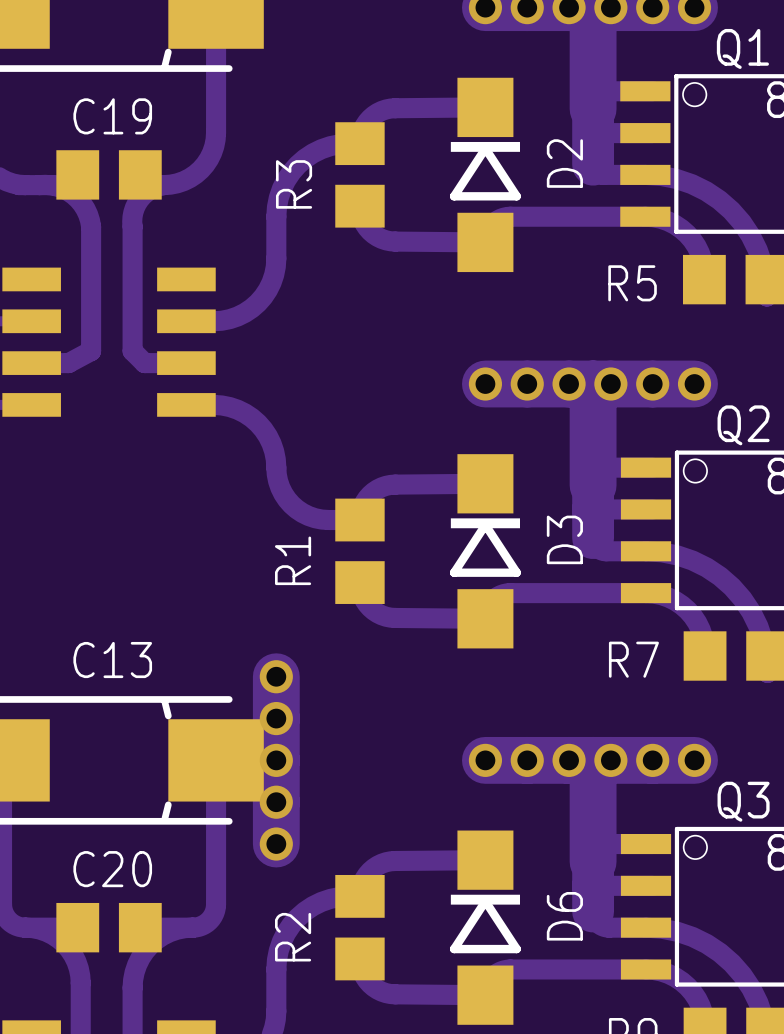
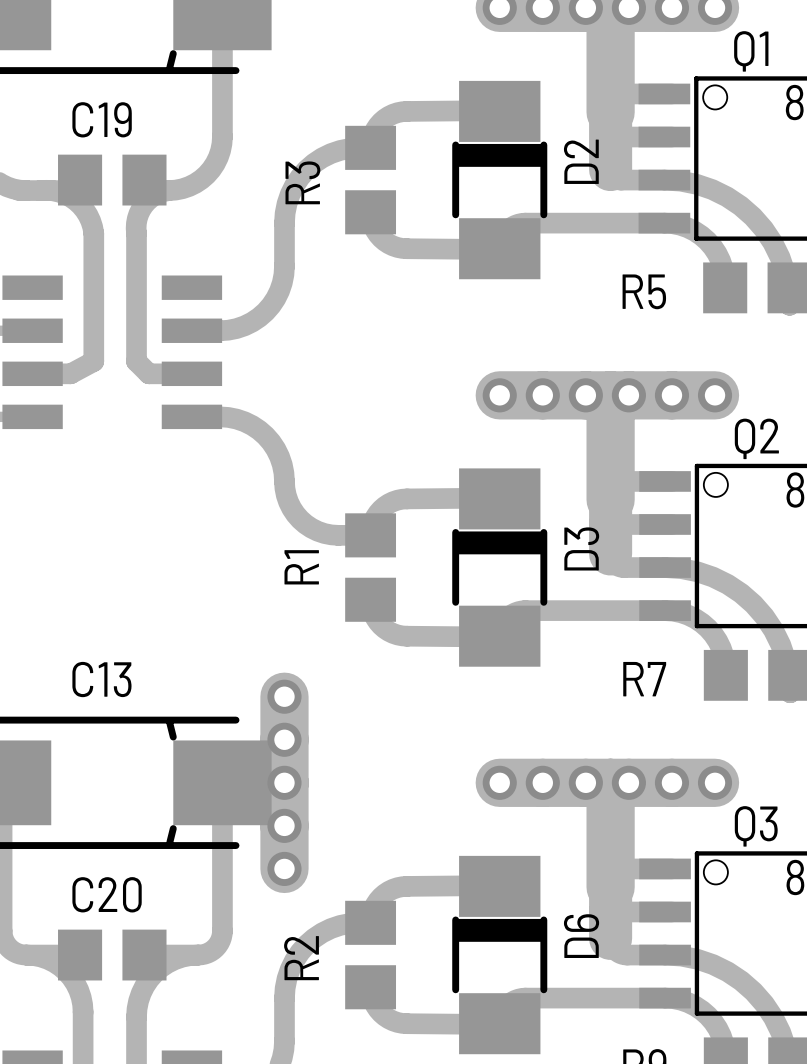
D2 footprint: [449, 77, 521, 273] -> [452, 80, 548, 280]
D3 footprint: [449, 454, 521, 649] -> [452, 468, 548, 667]
D6 footprint: [449, 830, 521, 1025] -> [452, 855, 548, 1055]

